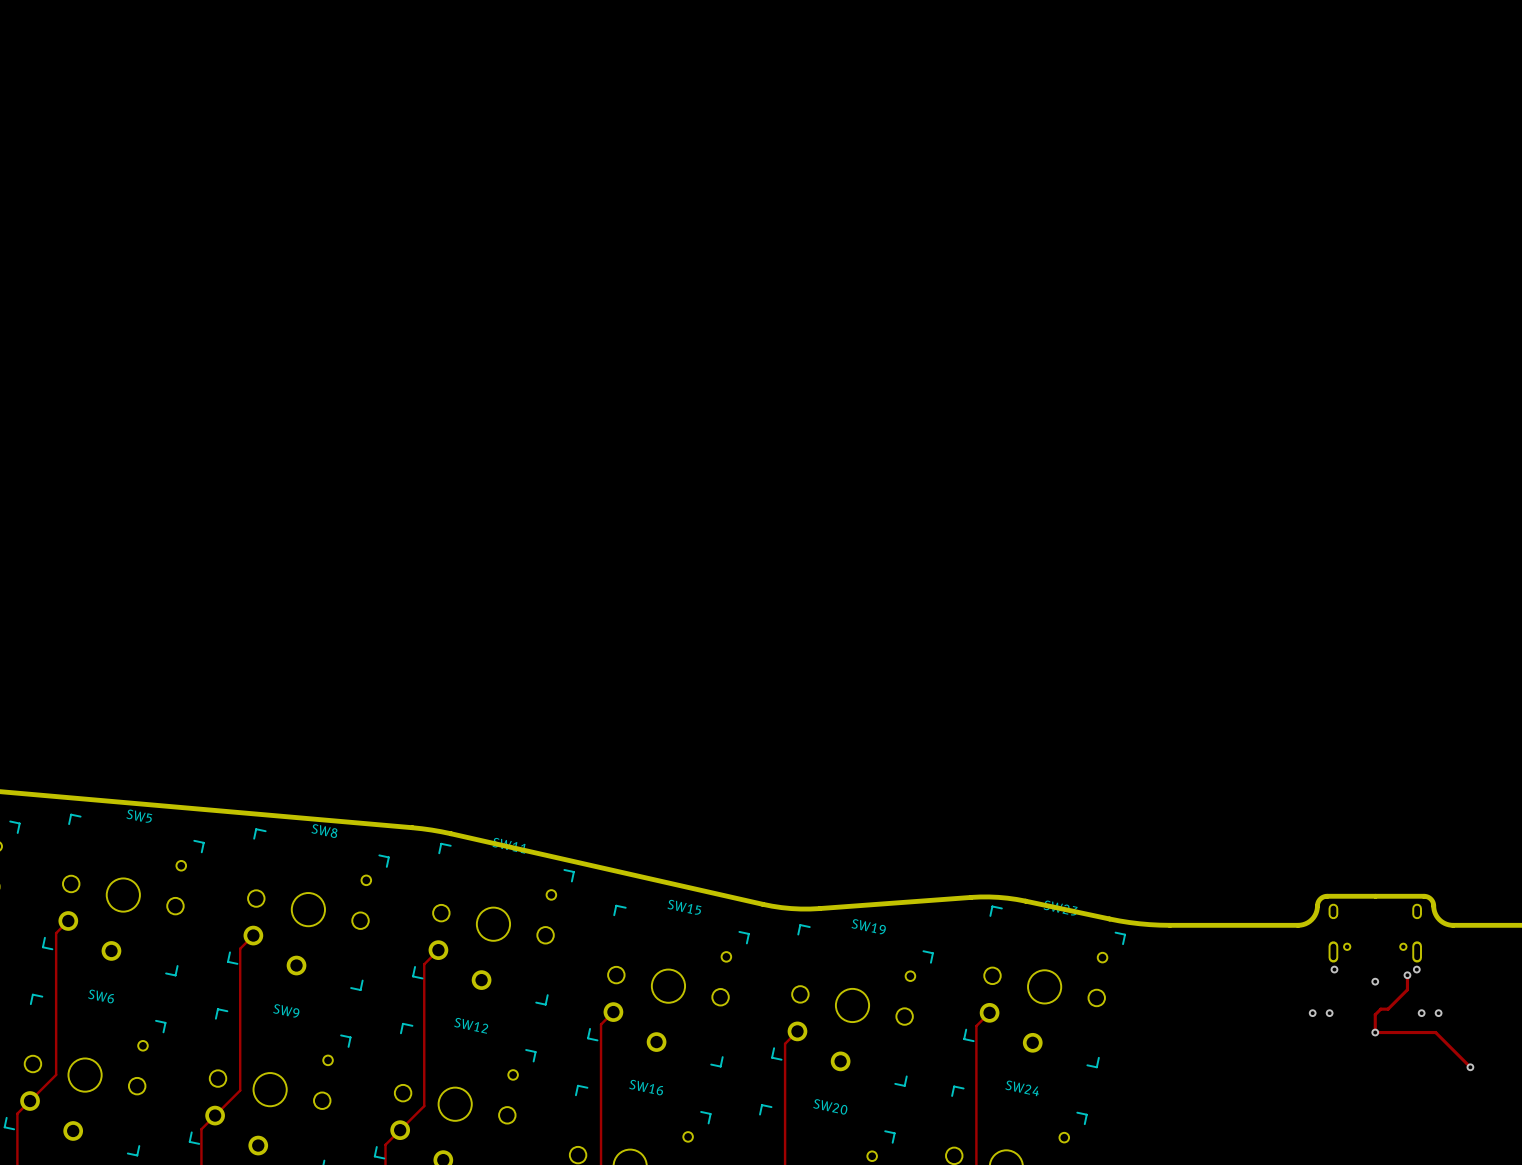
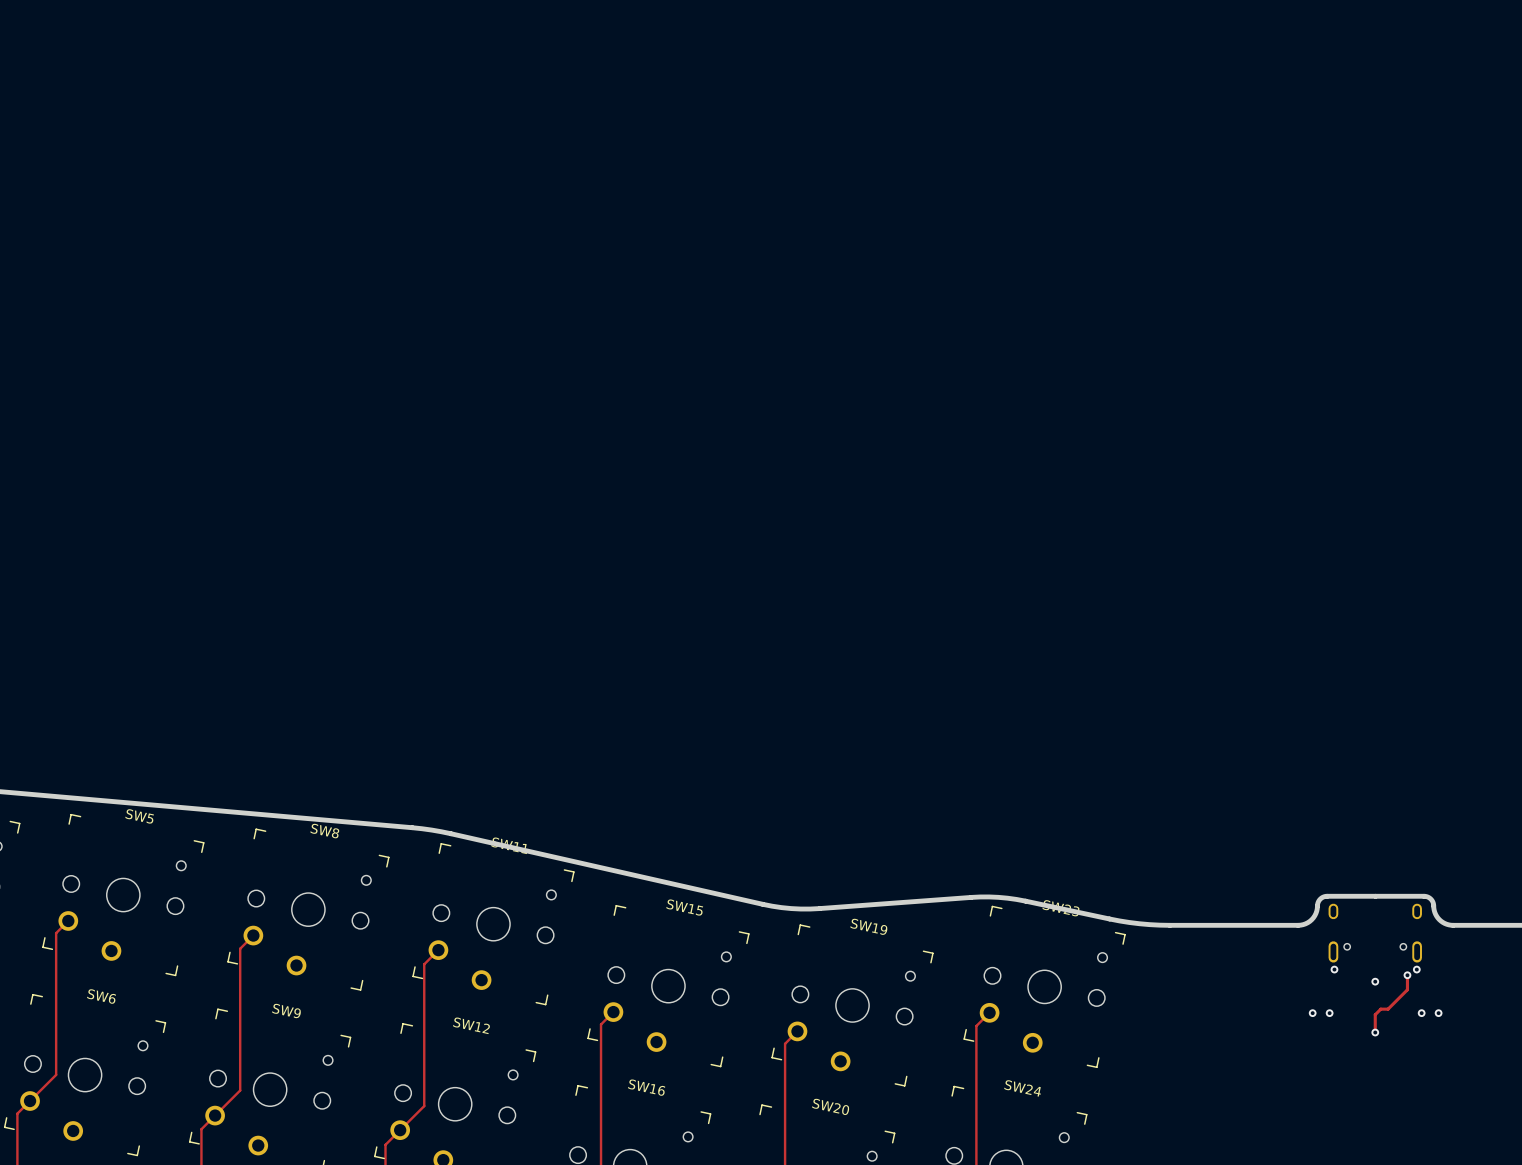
track: (1375, 1032) (1435, 1032) (1470, 1067) -> none
via: (1470, 1067) -> none

